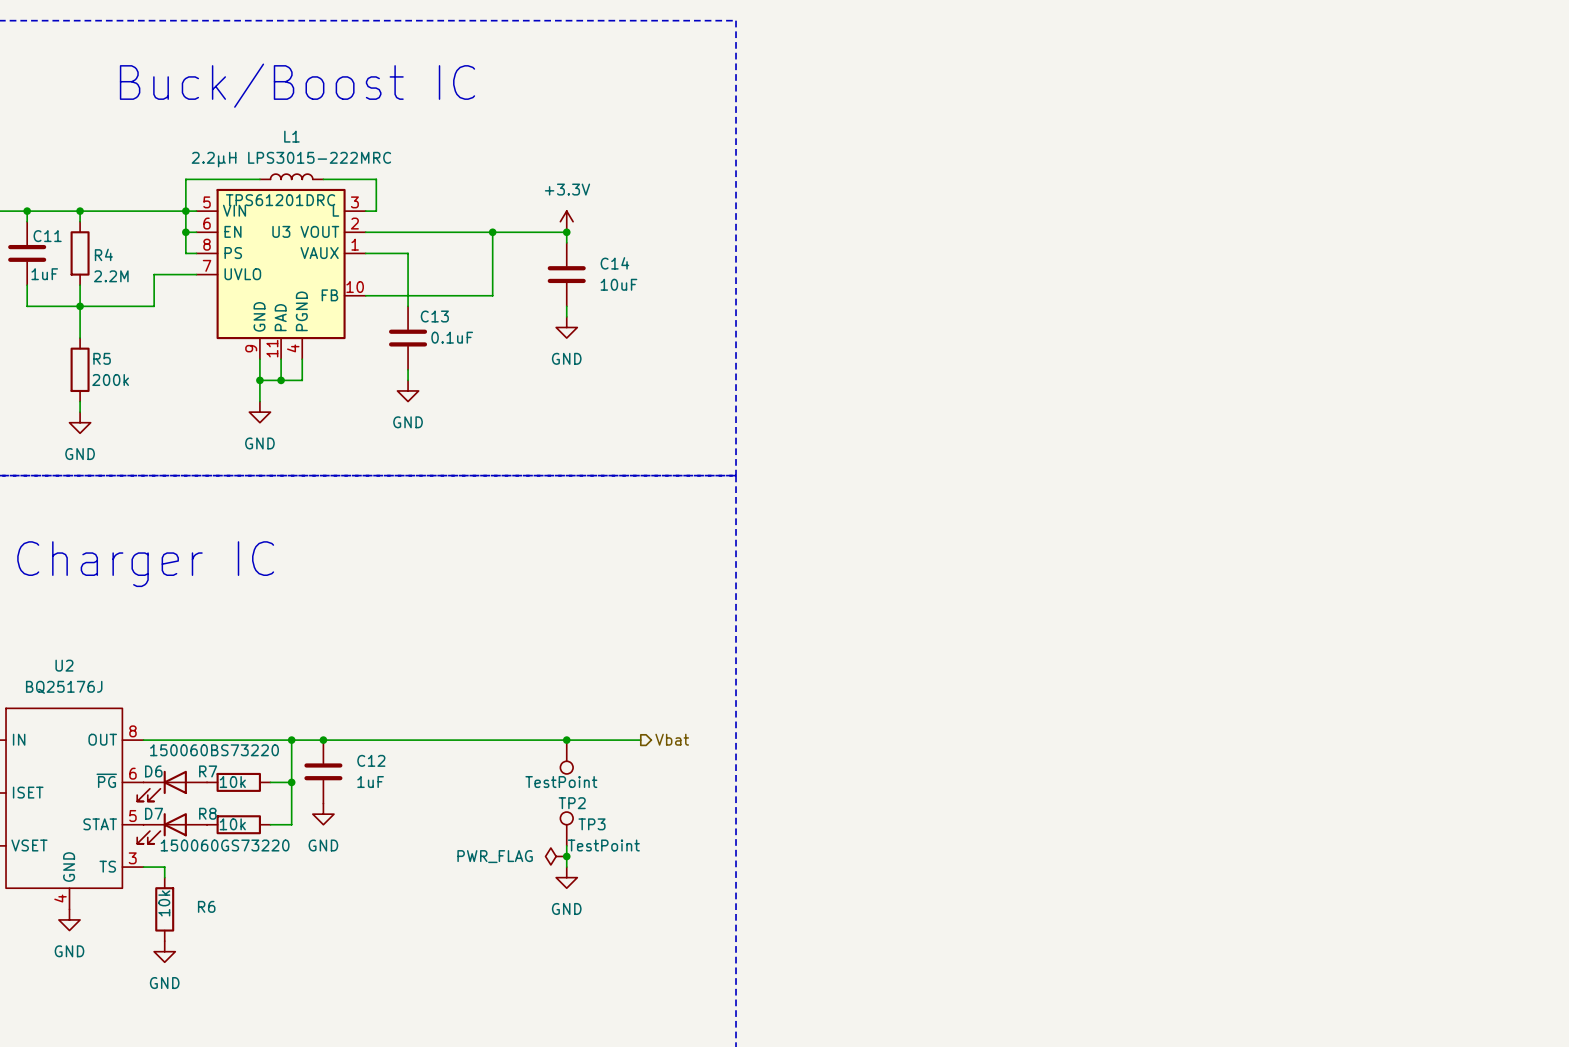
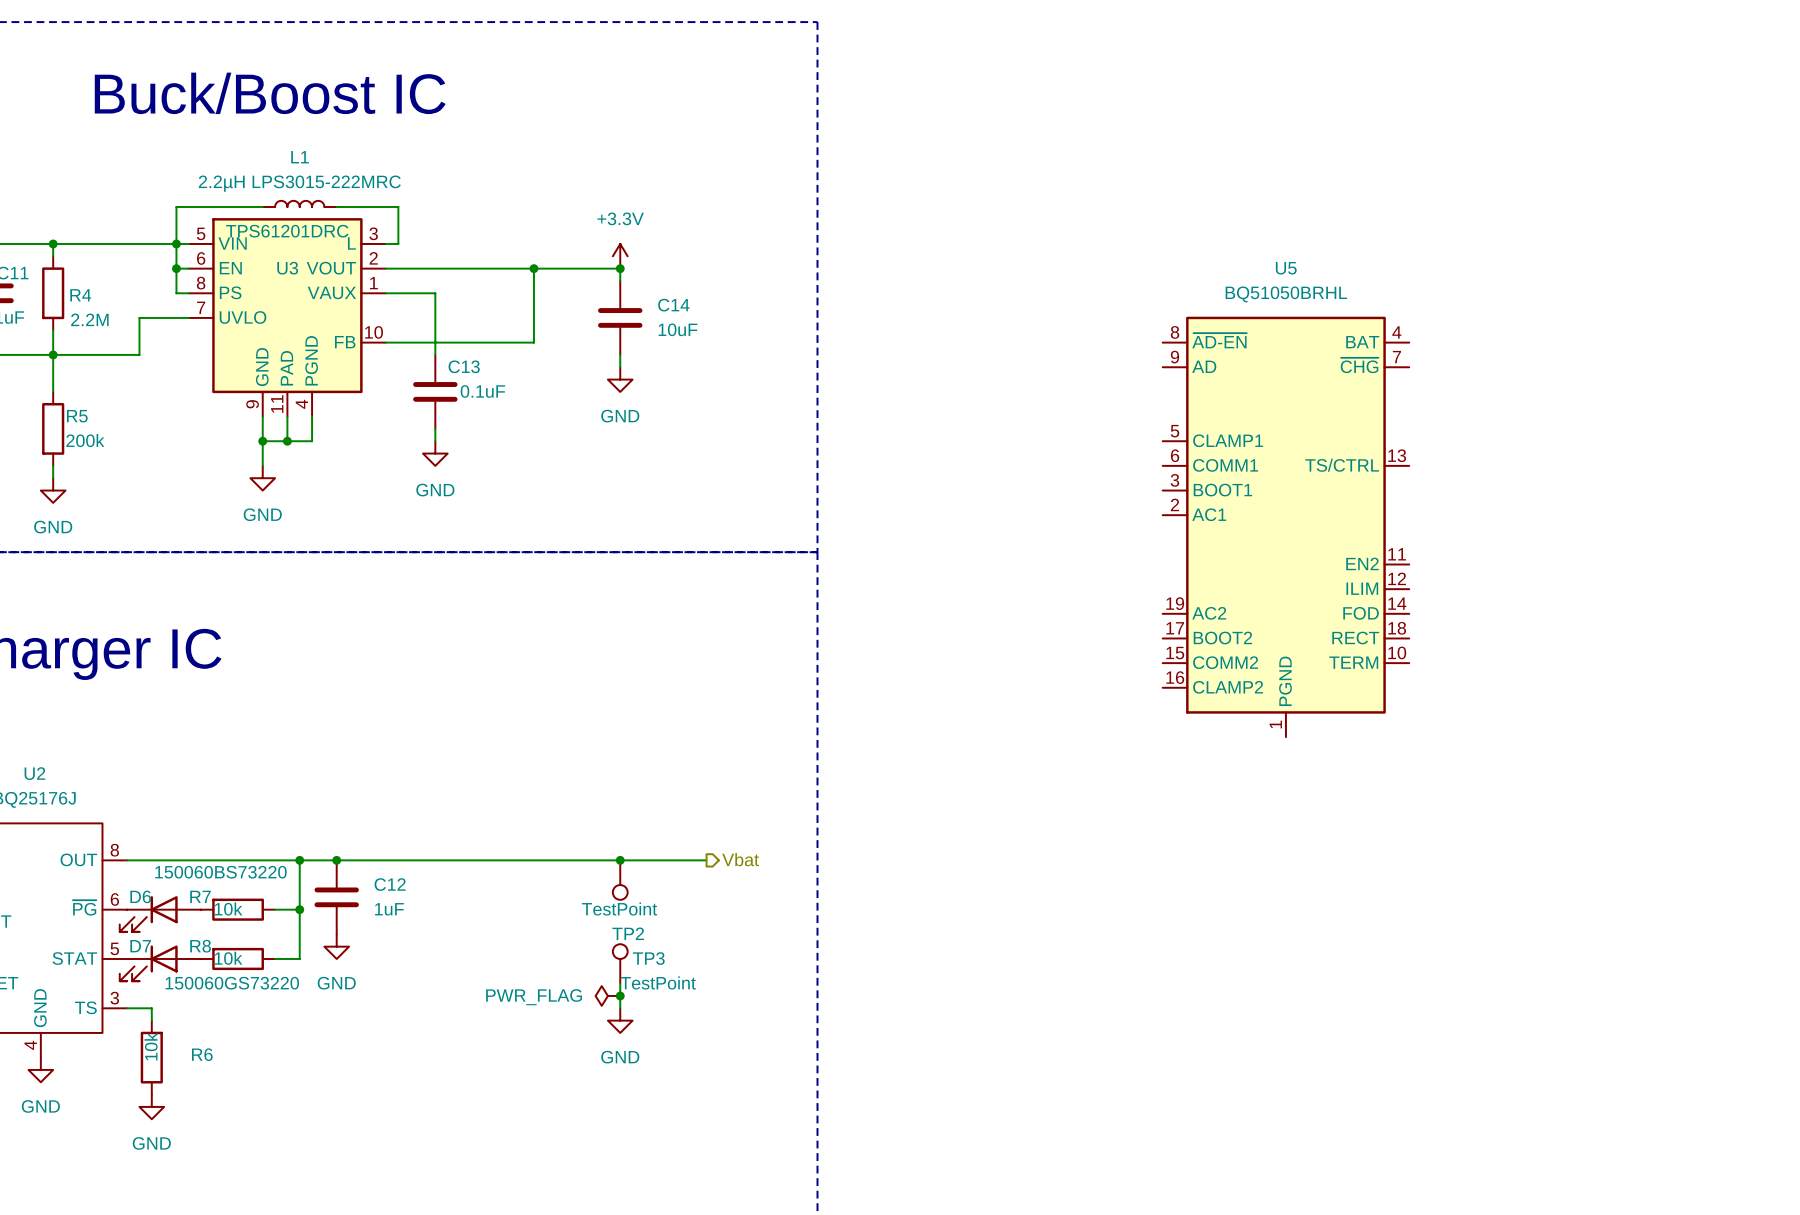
U5: none -> BQ51050BRHL (1285, 526)

